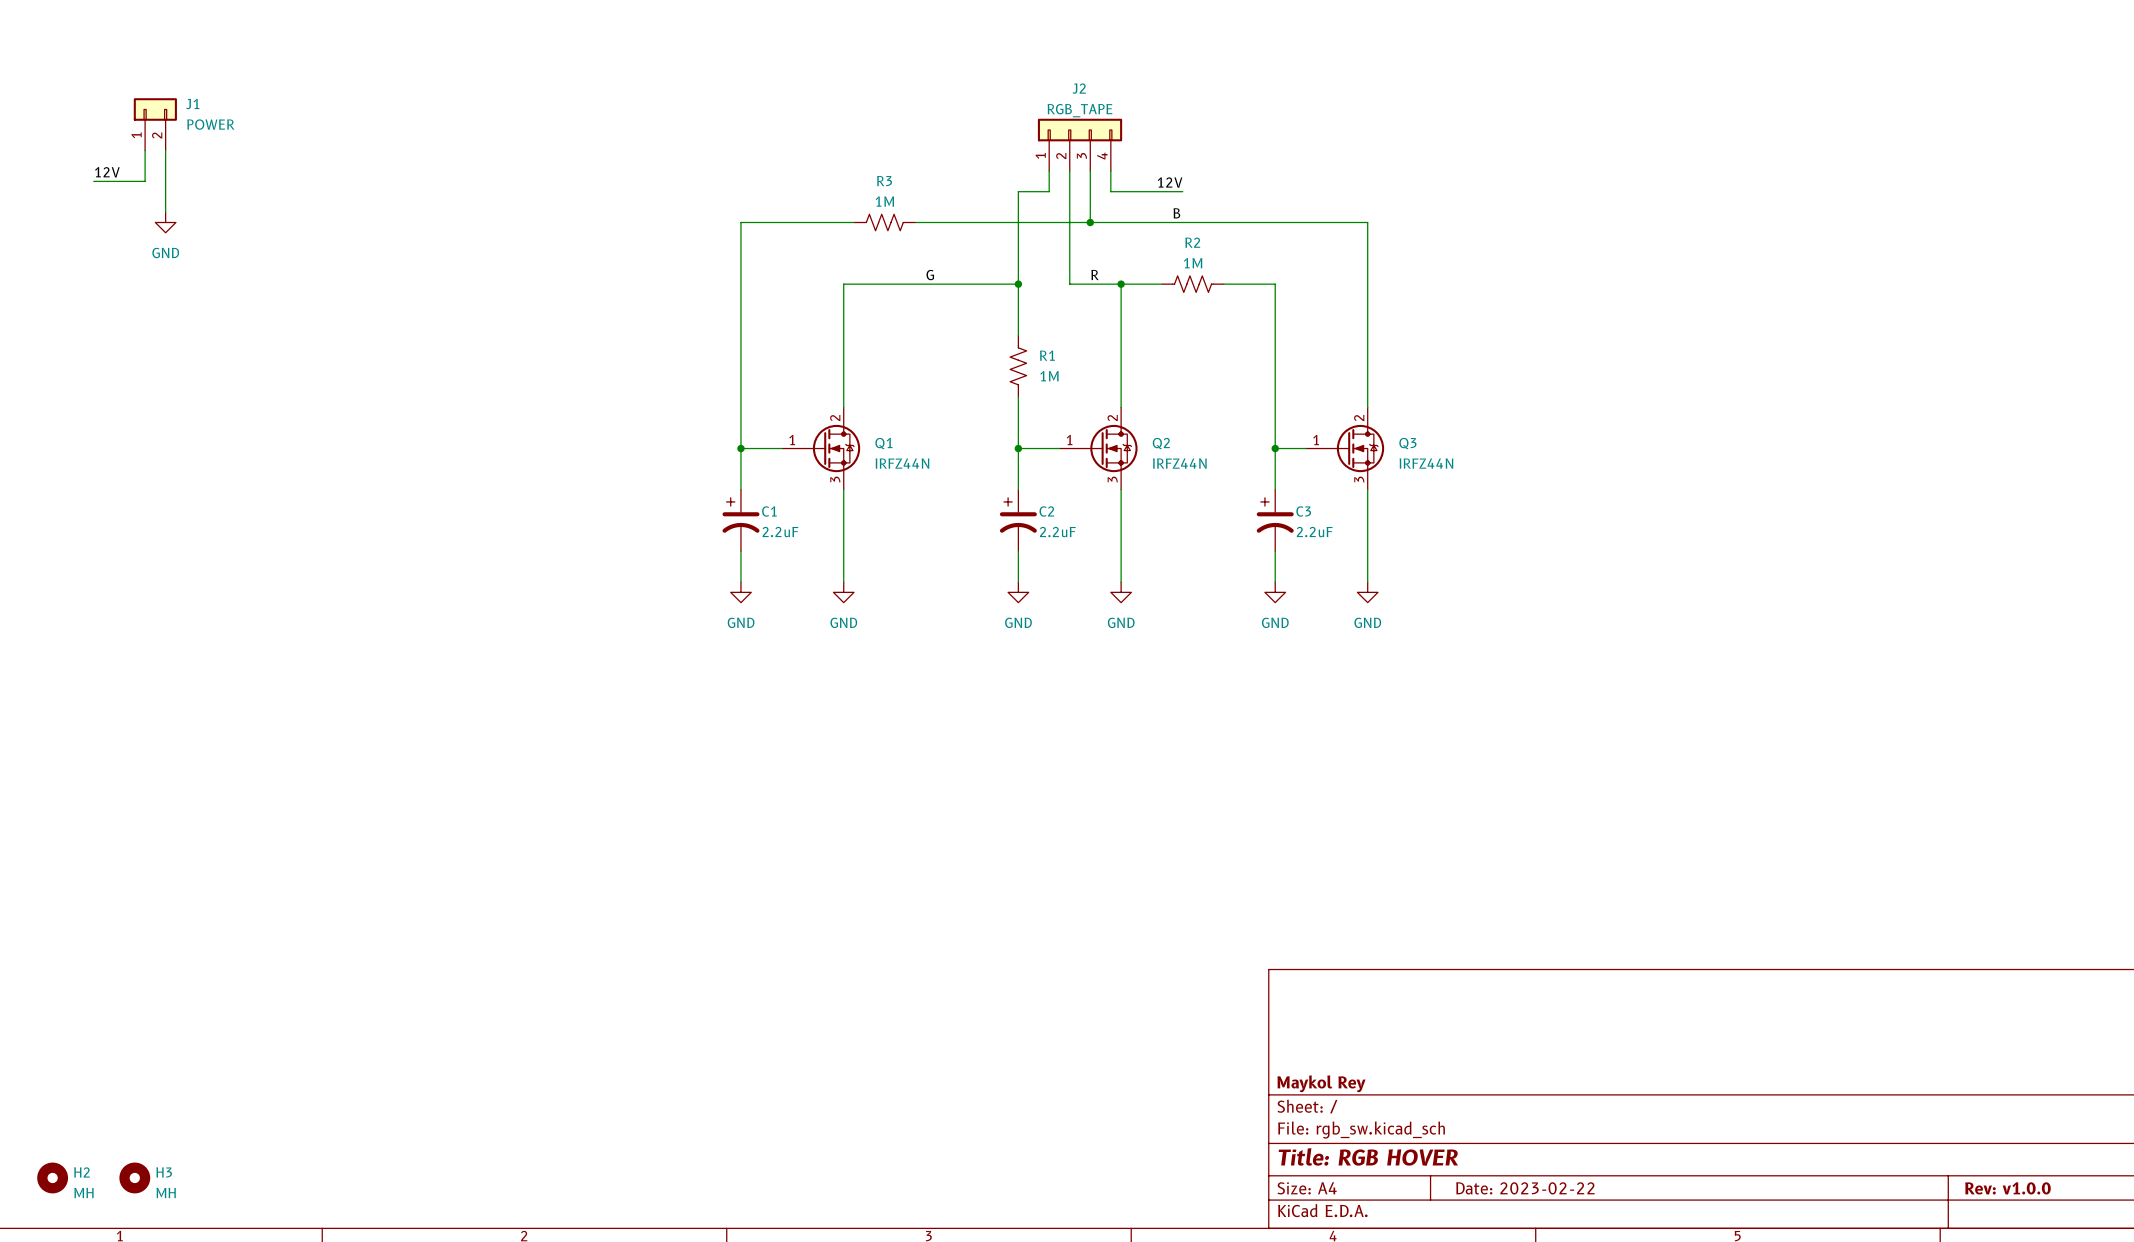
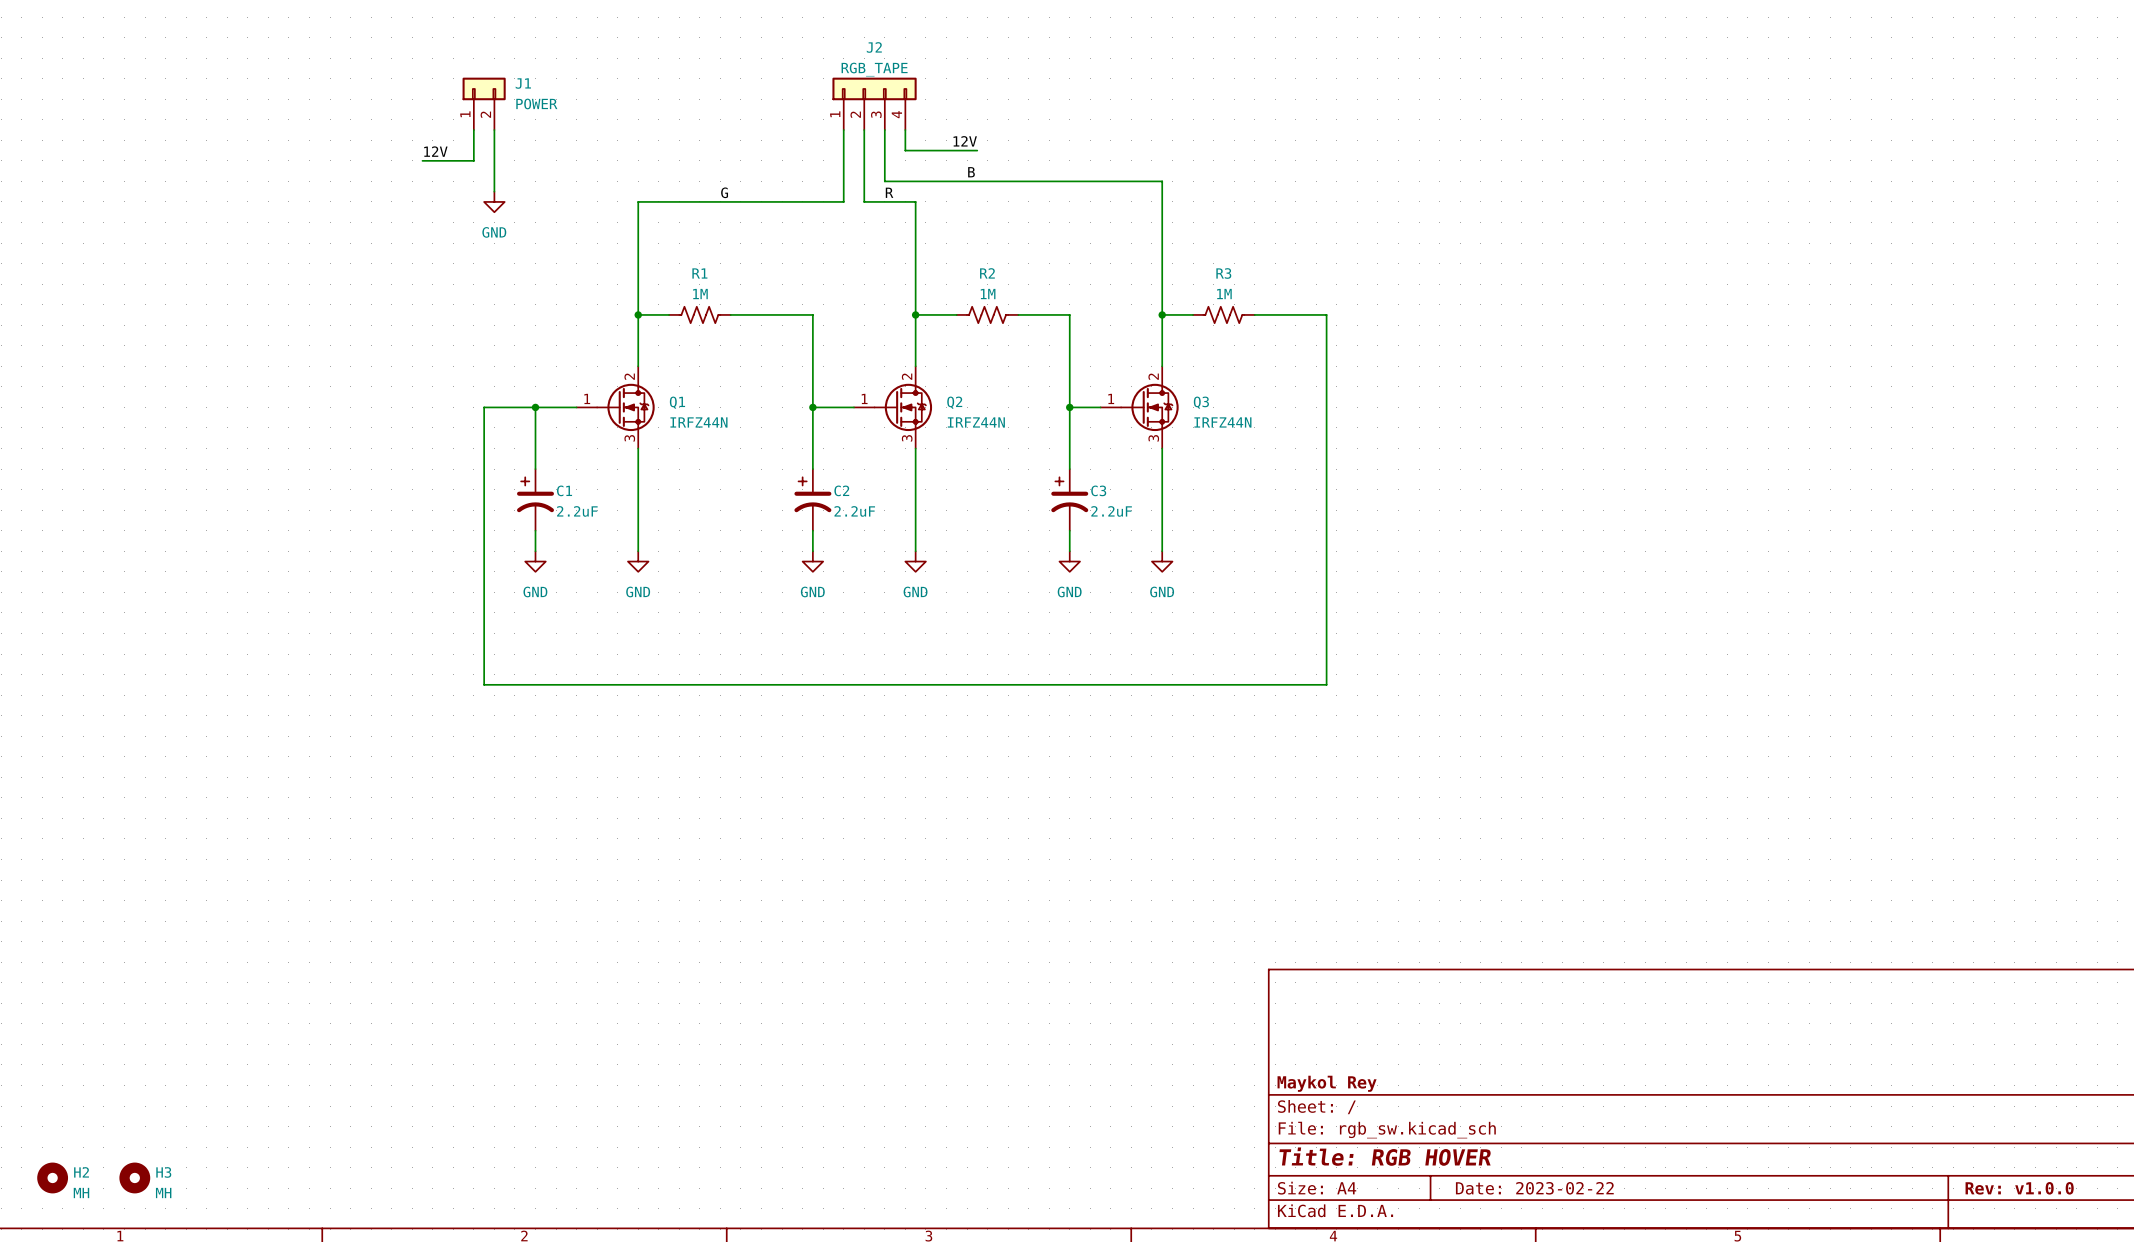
J1 position: (155, 124) -> (484, 103)
wire: none -> (473, 130) (473, 160) (422, 160)
wire: none -> (494, 130) (494, 191)
wire: none -> (843, 130) (843, 201) (638, 201) (638, 366)
wire: none -> (864, 130) (864, 201) (915, 201) (915, 366)
wire: none -> (884, 130) (884, 181) (1162, 181) (1162, 366)
wire: none -> (905, 130) (905, 150) (977, 150)
label: none -> 12V (965, 141)
J2 position: (1080, 144) -> (874, 103)
wire: (145, 150) (145, 181) (93, 181) -> none
wire: (165, 150) (165, 212) -> none
label: none -> 12V (435, 151)
wire: (1049, 171) (1049, 191) (1018, 191) (1018, 335) -> none
wire: (1069, 171) (1069, 284) (1162, 284) -> none
wire: (1090, 171) (1090, 222) -> none
wire: (1110, 171) (1110, 191) (1182, 191) -> none
label: 12V (107, 172) -> none
label: none -> B (971, 172)
label: 12V (1170, 182) -> none
label: none -> G (724, 192)
label: none -> R (889, 192)
power symbol: none -> GND (494, 201)
label: B (1176, 213) -> none
power symbol: GND (165, 222) -> none
wire: (853, 222) (740, 222) (740, 489) -> none
R3 position: (884, 222) -> (1223, 314)
wire: (915, 222) (1367, 222) (1367, 407) -> none
junction: (1090, 222) -> none
label: G (930, 275) -> none
label: R (1094, 275) -> none
wire: (1018, 284) (843, 284) (843, 407) -> none
junction: (1018, 284) -> none
wire: (1121, 284) (1121, 407) -> none
junction: (1121, 284) -> none
R2 position: (1193, 284) -> (987, 314)
wire: (1223, 284) (1275, 284) (1275, 489) -> none
wire: none -> (638, 314) (669, 314)
junction: none -> (638, 314)
wire: none -> (730, 314) (812, 314) (812, 469)
junction: none -> (915, 314)
wire: none -> (1018, 314) (1069, 314) (1069, 469)
junction: none -> (1162, 314)
wire: none -> (1254, 314) (1326, 314) (1326, 684) (484, 684) (484, 407) (576, 407)
R1 name position: R1 (1047, 355) -> R1 (699, 273)
R1 rotation: 0° (1018, 366) -> 90° clockwise (699, 314)
R1 position: (1018, 366) -> (699, 314)
R1 value position: 1M (1049, 376) -> 1M (700, 294)
wire: (1018, 397) (1018, 489) -> none
wire: none -> (535, 407) (535, 469)
junction: none -> (535, 407)
junction: none -> (812, 407)
wire: none -> (1069, 407) (1100, 407)
junction: none -> (1069, 407)
wire: none -> (638, 448) (638, 551)
wire: (740, 448) (782, 448) -> (812, 407) (853, 407)
junction: (740, 448) -> none
Q1 position: (821, 448) -> (615, 407)
wire: none -> (915, 448) (915, 551)
wire: (1018, 448) (1059, 448) -> (915, 314) (956, 314)
junction: (1018, 448) -> none
Q2 position: (1098, 448) -> (893, 407)
wire: none -> (1162, 448) (1162, 551)
wire: (1275, 448) (1306, 448) -> (1162, 314) (1193, 314)
junction: (1275, 448) -> none
Q3 position: (1345, 448) -> (1139, 407)
wire: (843, 489) (843, 582) -> none
wire: (1121, 489) (1121, 582) -> none
wire: (1367, 489) (1367, 582) -> none
C1 position: (740, 520) -> (535, 499)
C2 position: (1018, 520) -> (812, 499)
C3 position: (1275, 520) -> (1069, 499)
wire: none -> (535, 530) (535, 551)
wire: none -> (812, 530) (812, 551)
wire: none -> (1069, 530) (1069, 551)
wire: (740, 551) (740, 582) -> none
wire: (1018, 551) (1018, 582) -> none
wire: (1275, 551) (1275, 582) -> none
power symbol: none -> GND (535, 561)
power symbol: none -> GND (638, 561)
power symbol: none -> GND (812, 561)
power symbol: none -> GND (915, 561)
power symbol: none -> GND (1069, 561)
power symbol: none -> GND (1162, 561)
power symbol: GND (740, 592) -> none
power symbol: GND (843, 592) -> none
power symbol: GND (1018, 592) -> none
power symbol: GND (1121, 592) -> none
power symbol: GND (1275, 592) -> none
power symbol: GND (1367, 592) -> none

